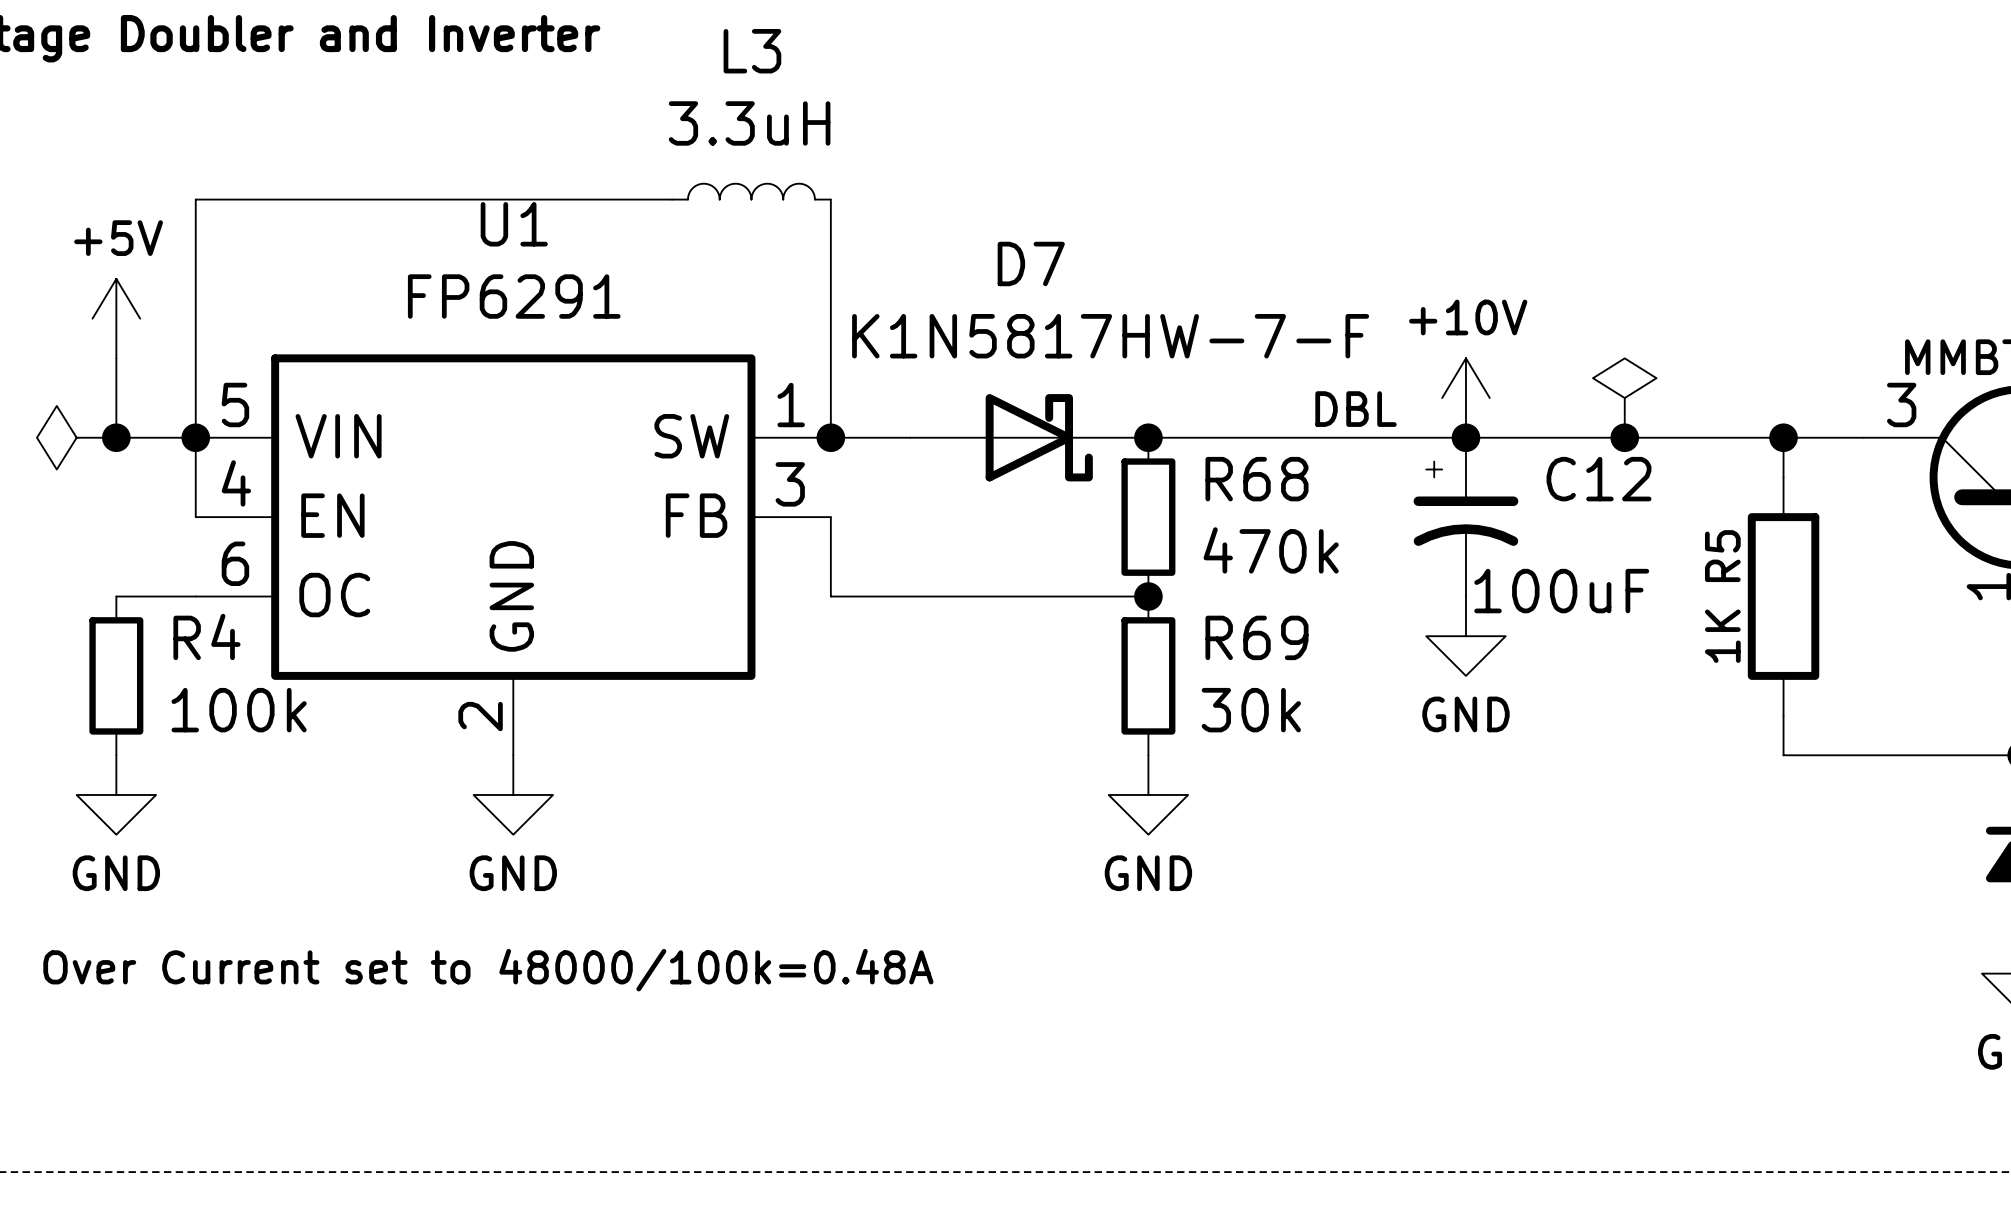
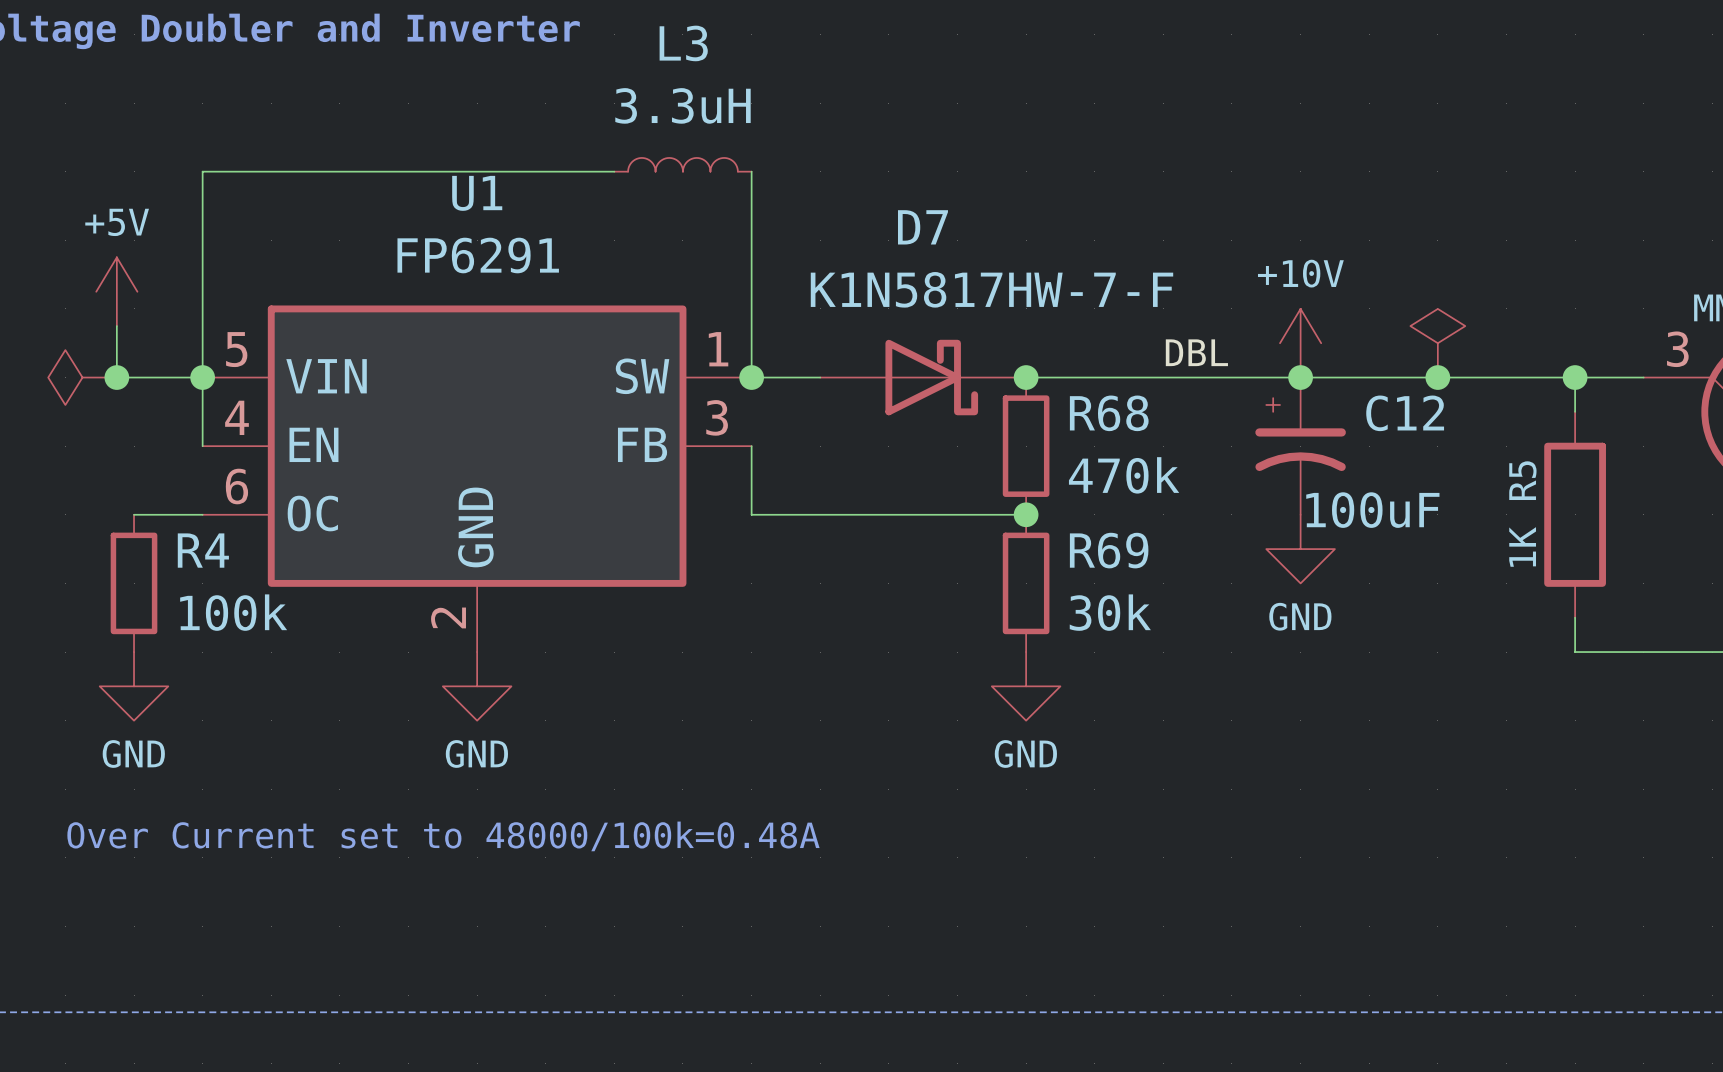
power symbol position: +5V (116, 318) -> +5V (116, 291)
wire: (116, 358) (116, 437) -> (116, 326) (116, 377) (134, 377)
power symbol position: (76, 437) -> (82, 377)
junction position: (116, 437) -> (116, 377)

